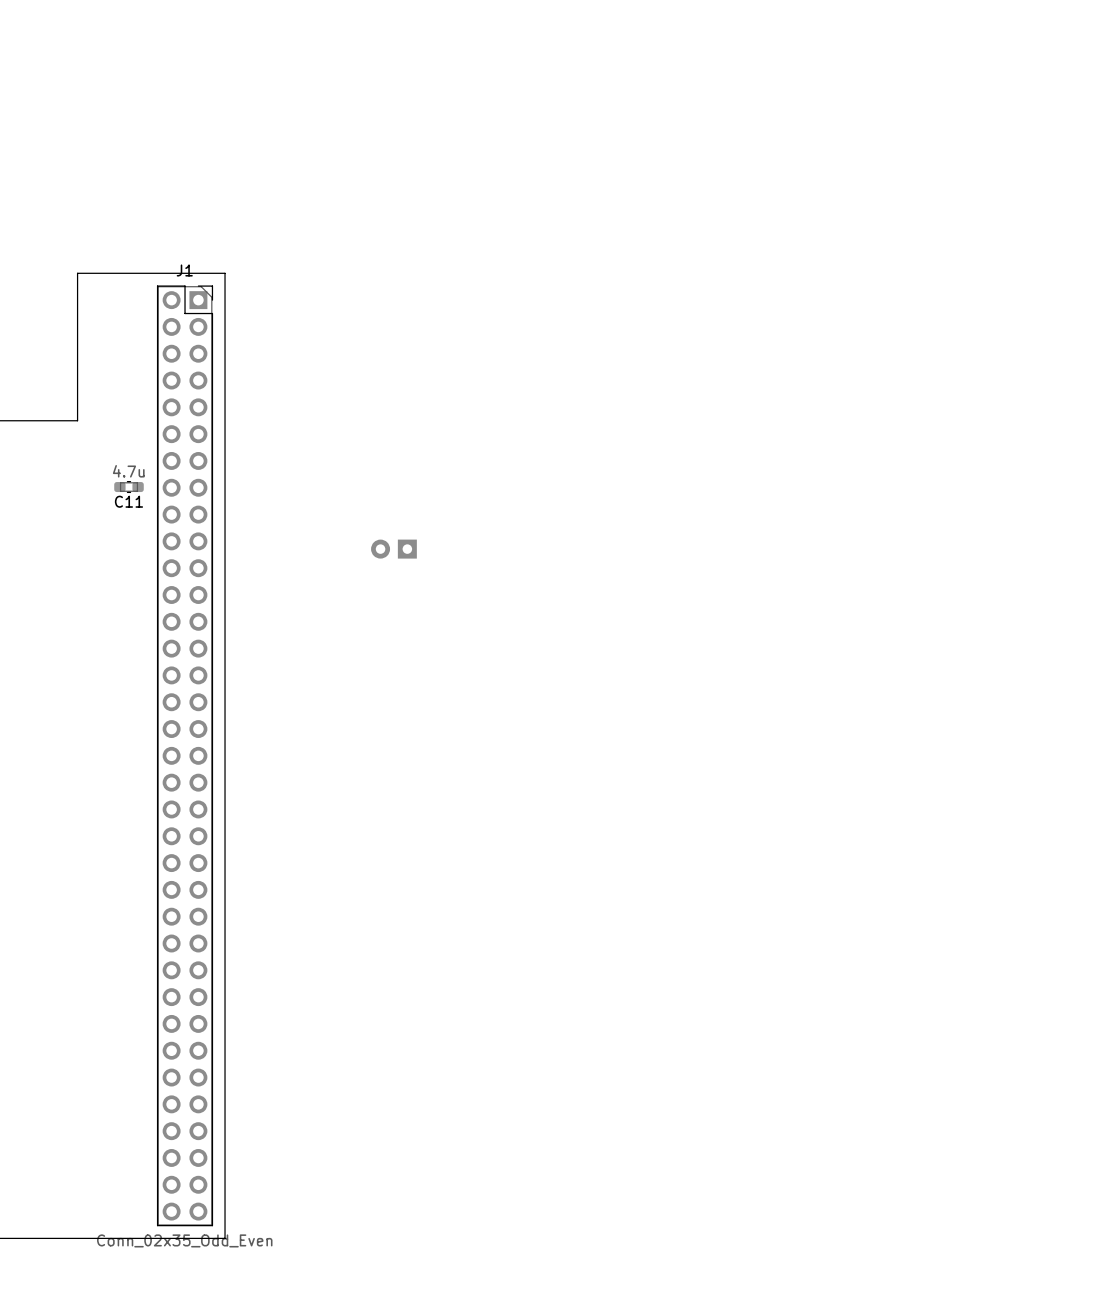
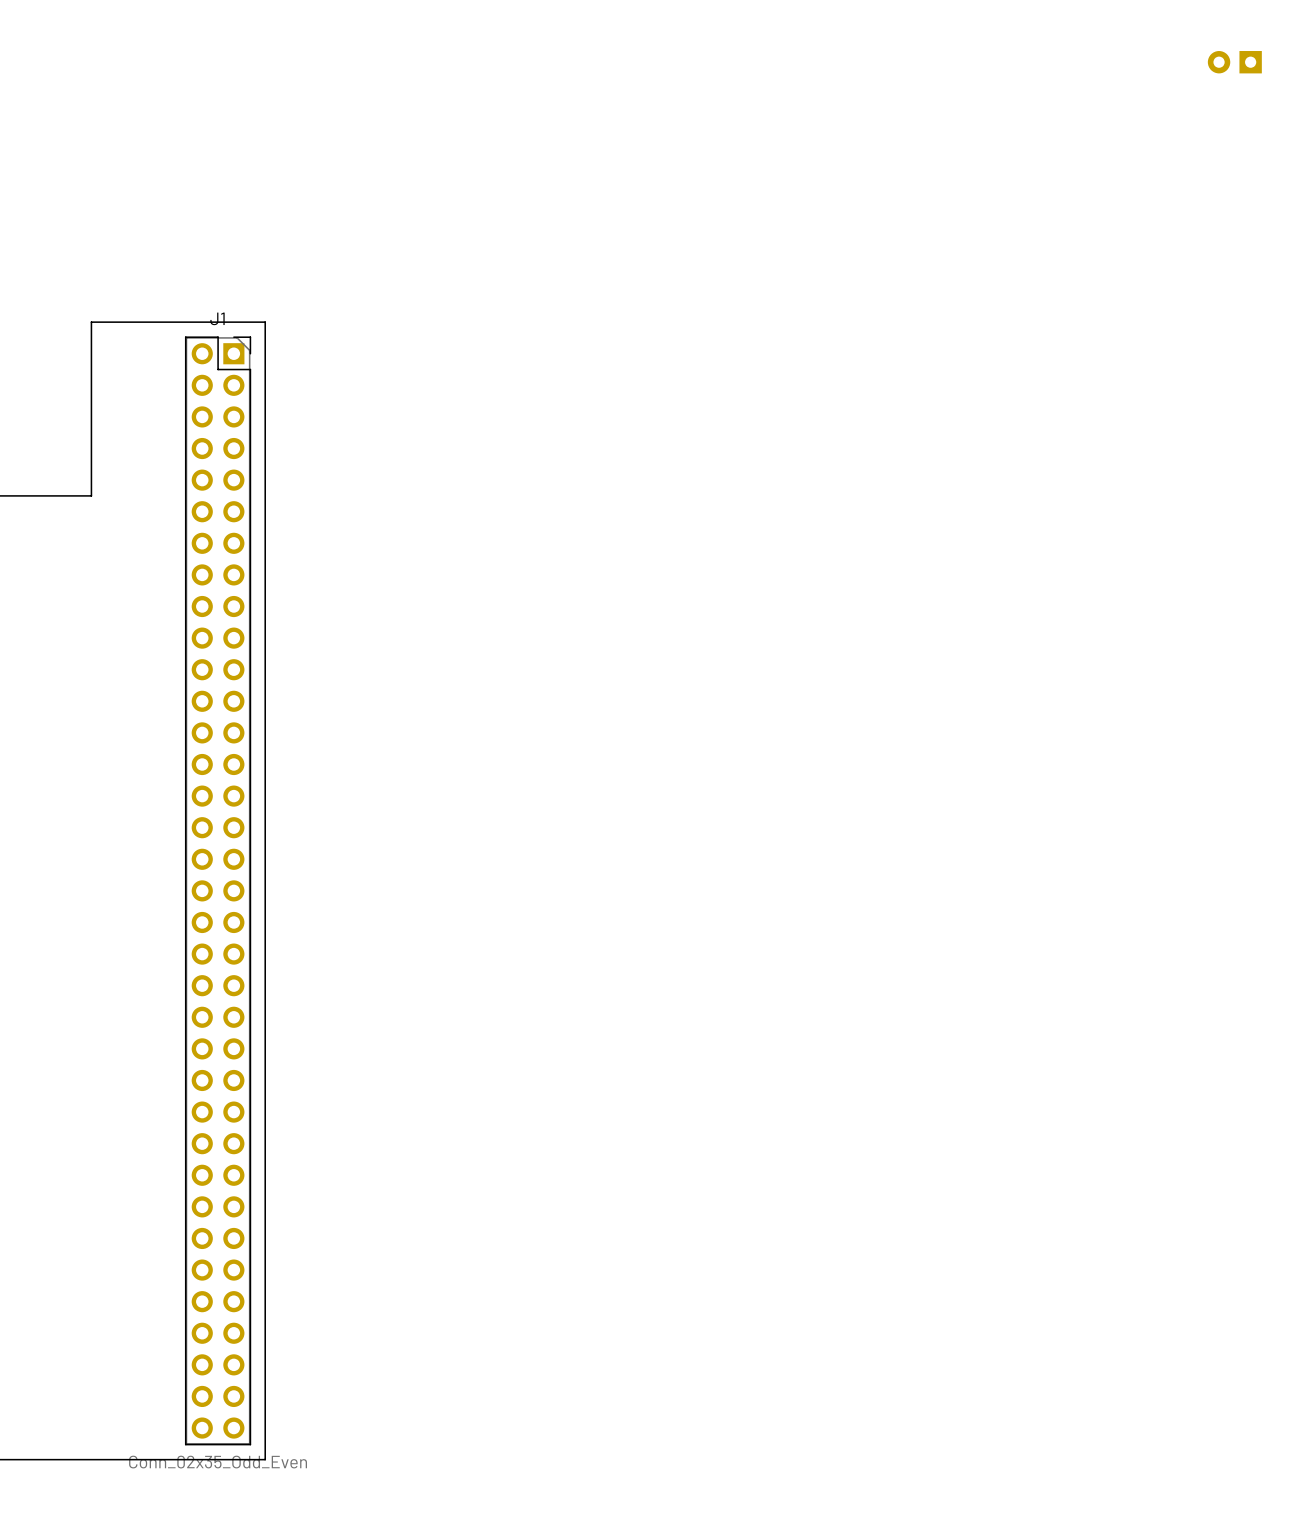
part: none -> (1234, 62)
C11: 4.7u (128, 487) -> none
part: (393, 549) -> none

